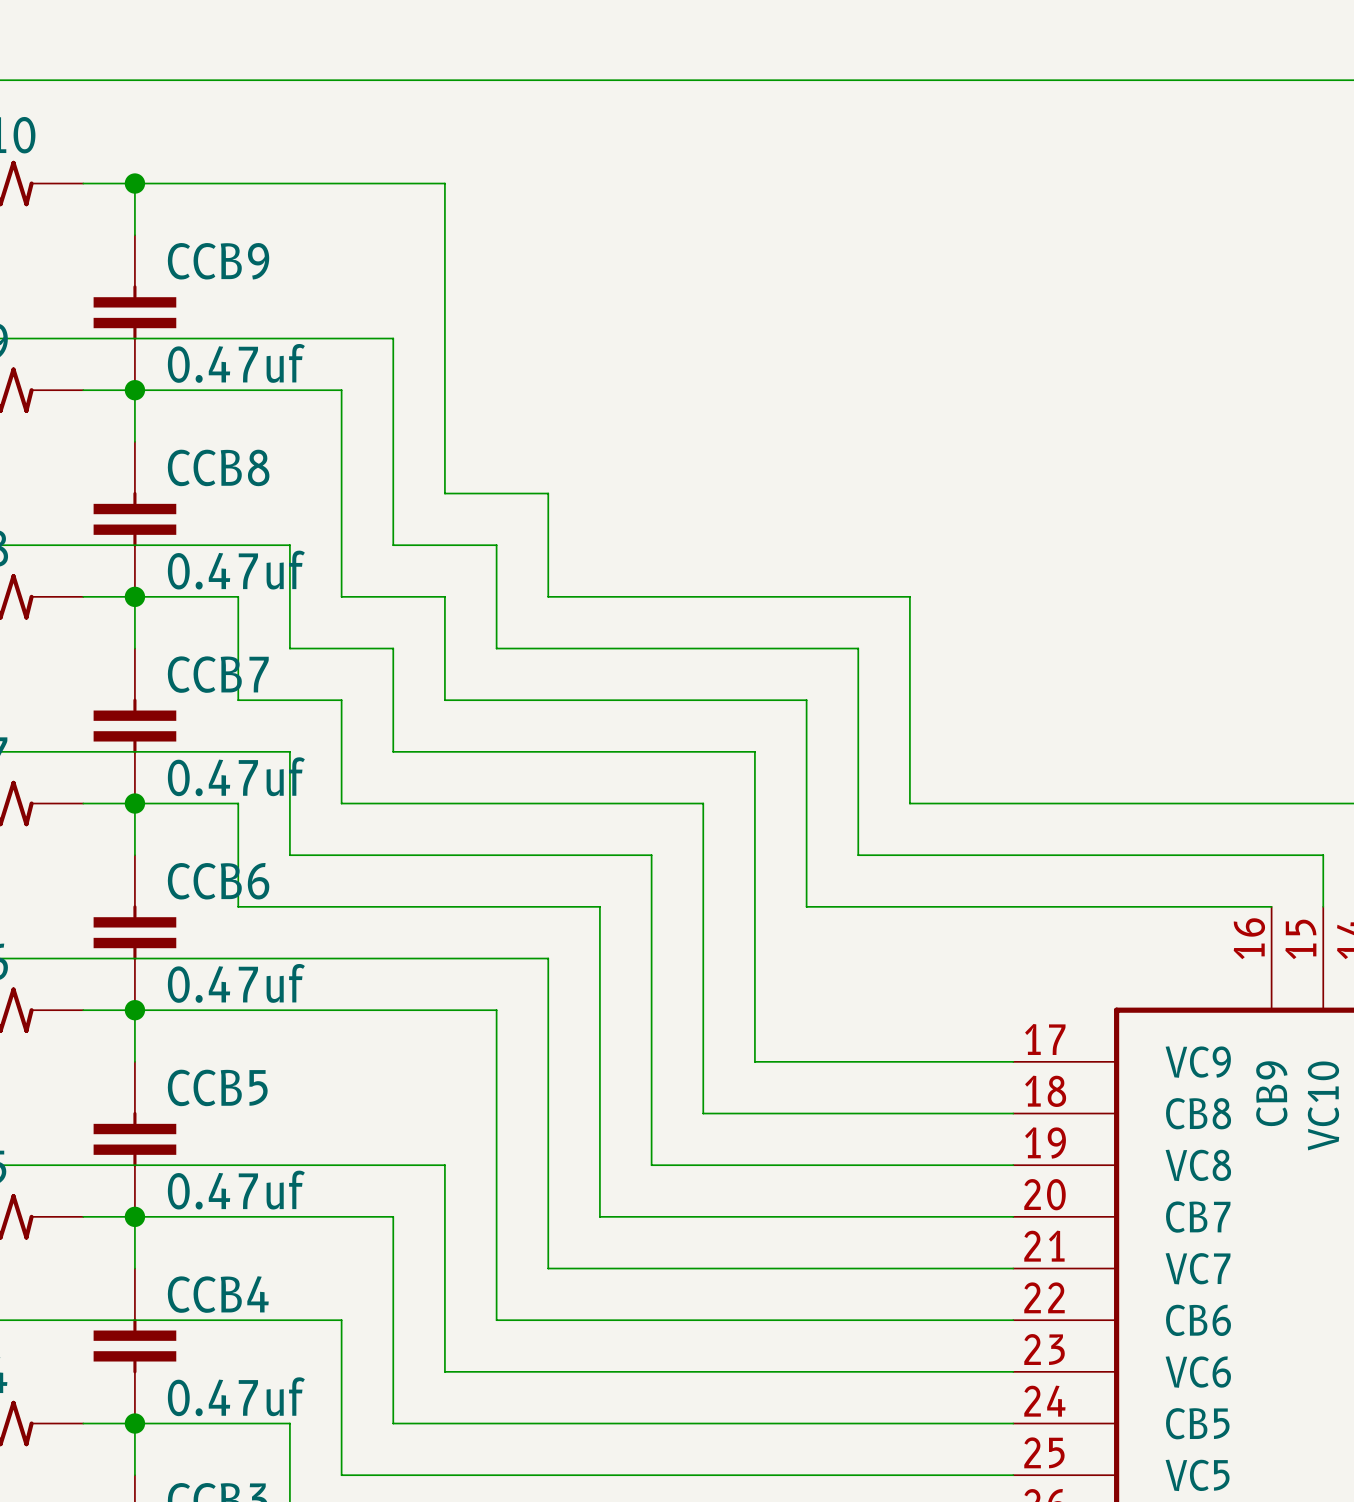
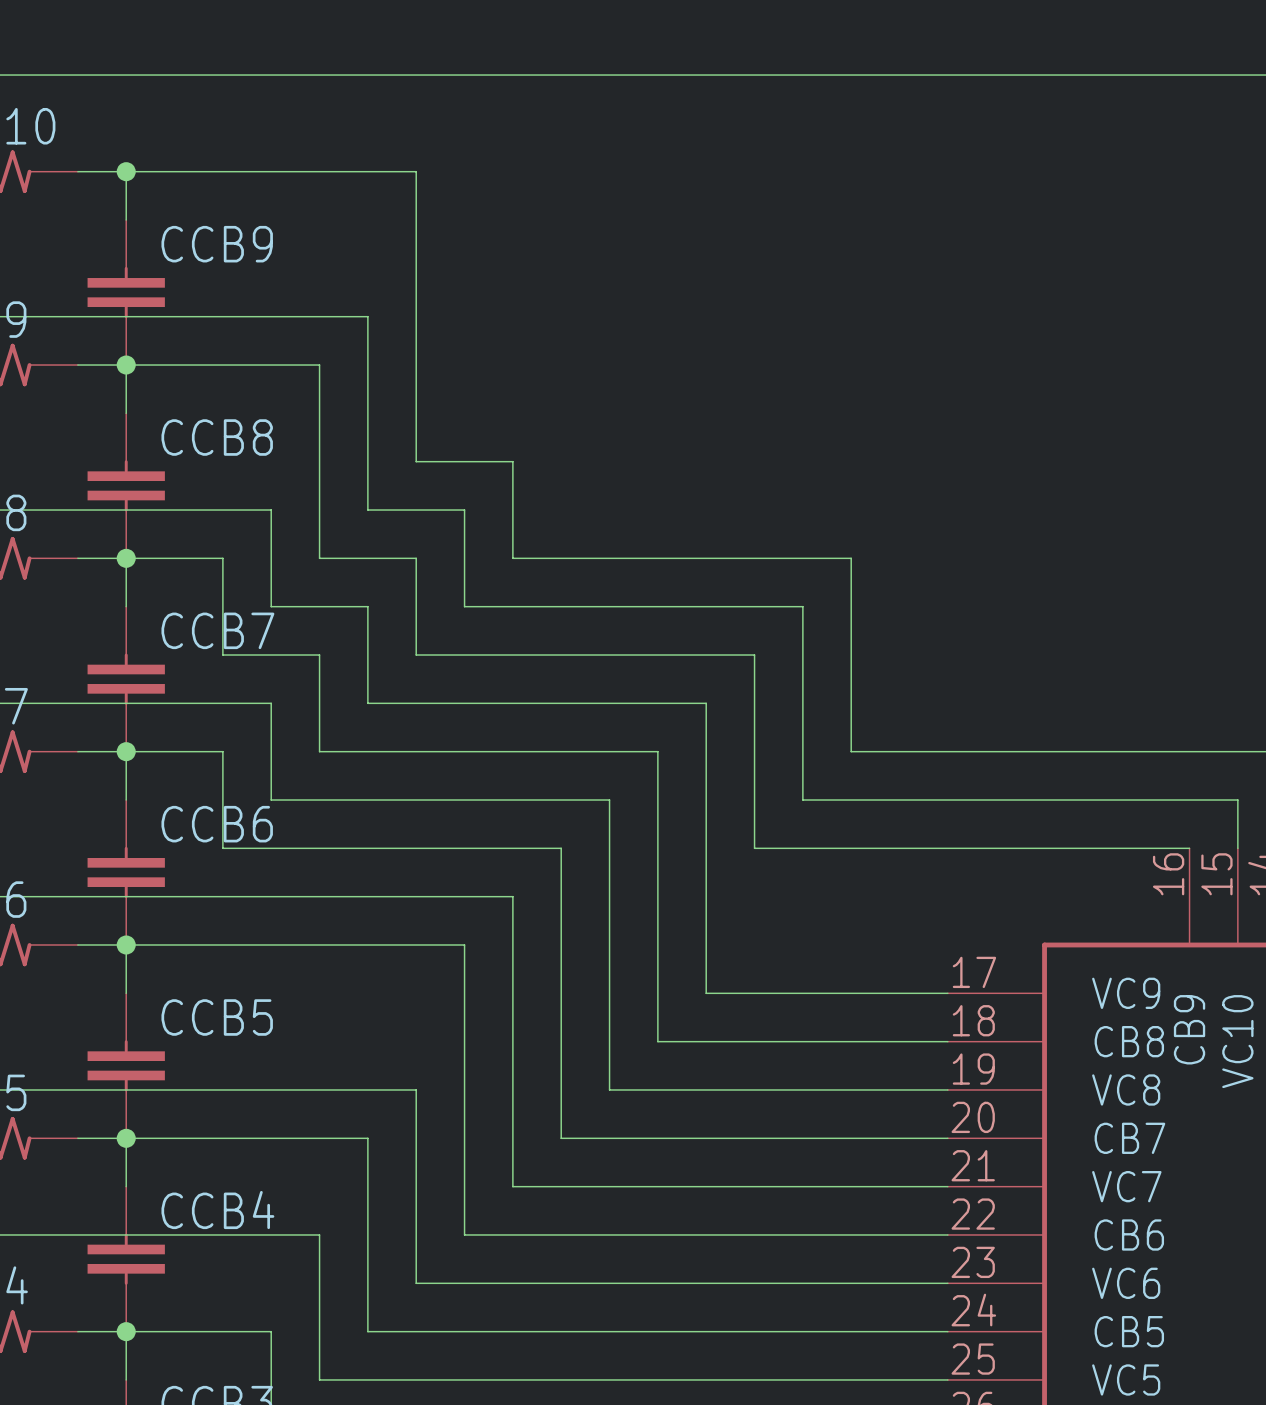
CCB9 value: 0.47uf (236, 363) -> none
CCB8 value: 0.47uf (236, 570) -> none
CCB7 value: 0.47uf (236, 776) -> none
CCB6 value: 0.47uf (236, 983) -> none
CCB5 value: 0.47uf (236, 1190) -> none
CCB4 value: 0.47uf (236, 1396) -> none

